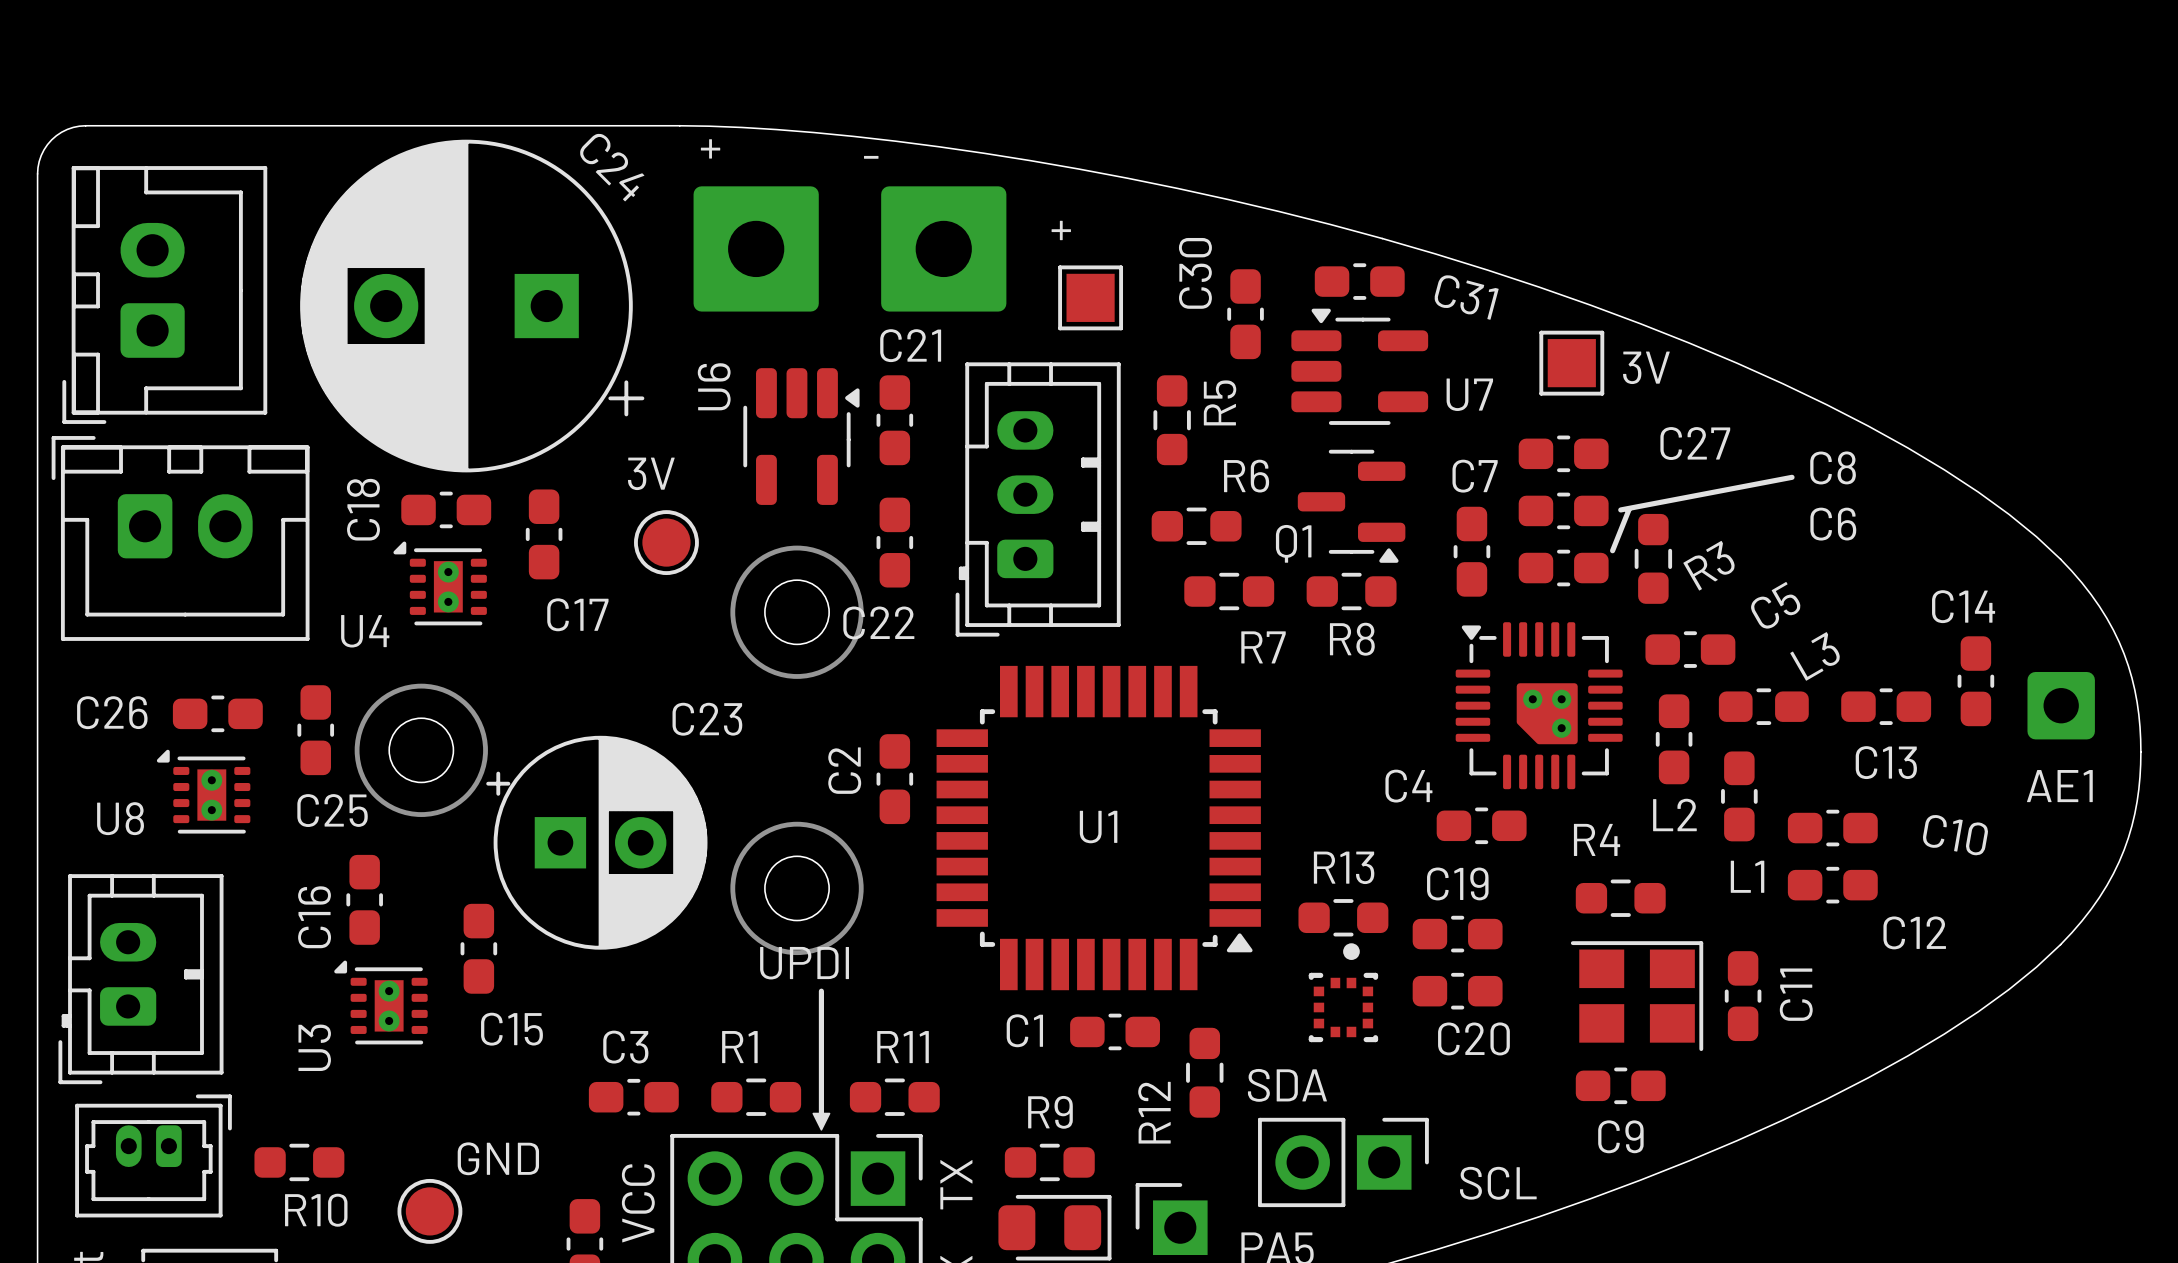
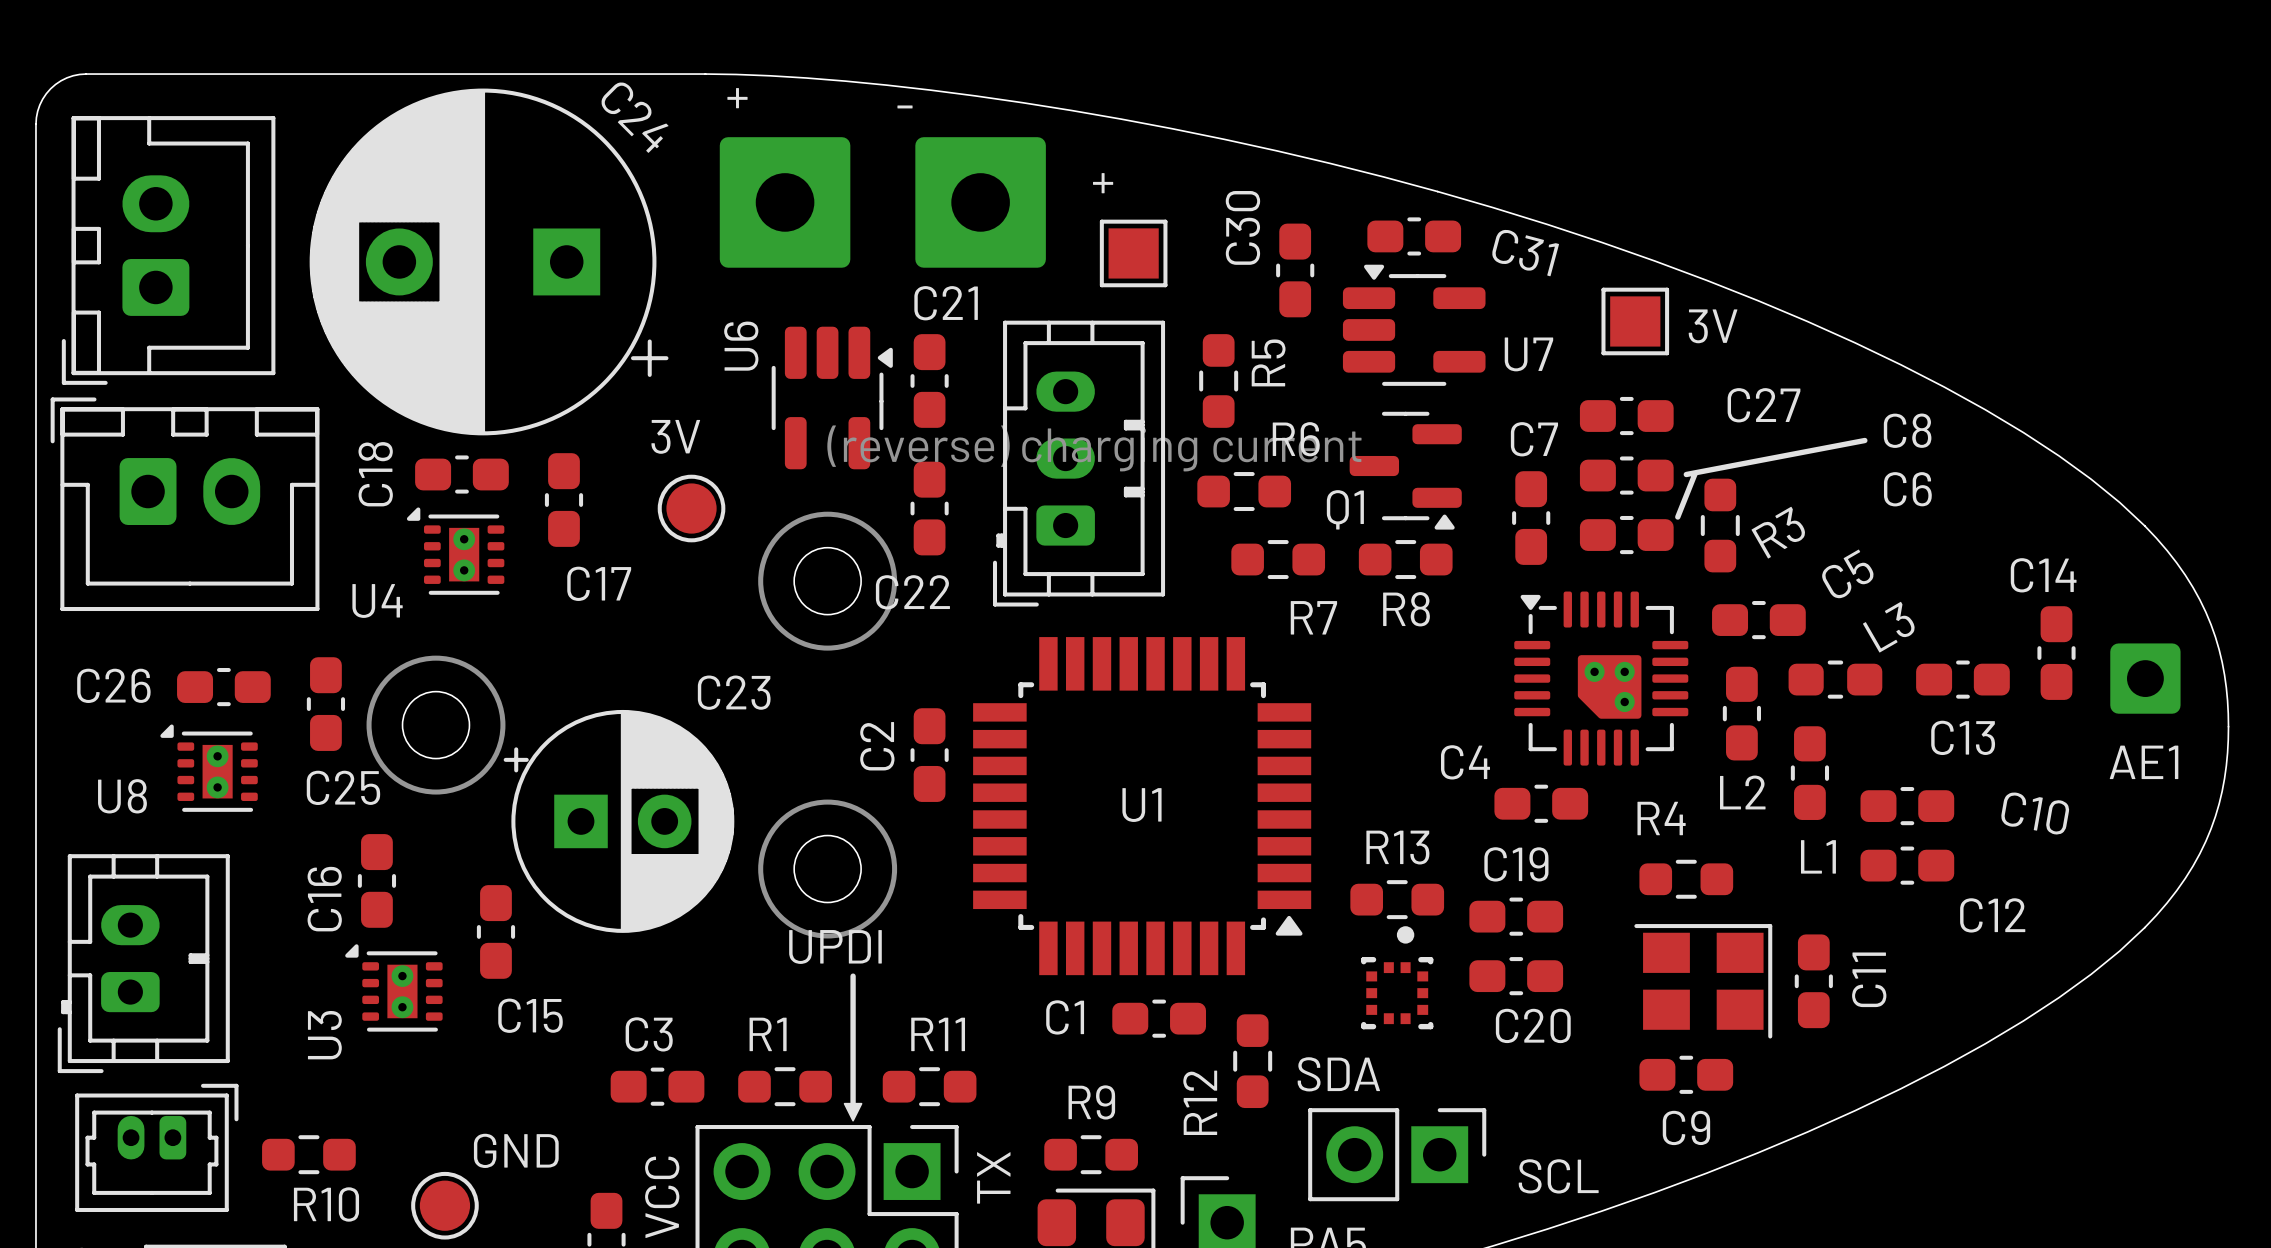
text: none -> (reverse) charging current (1094, 448)

